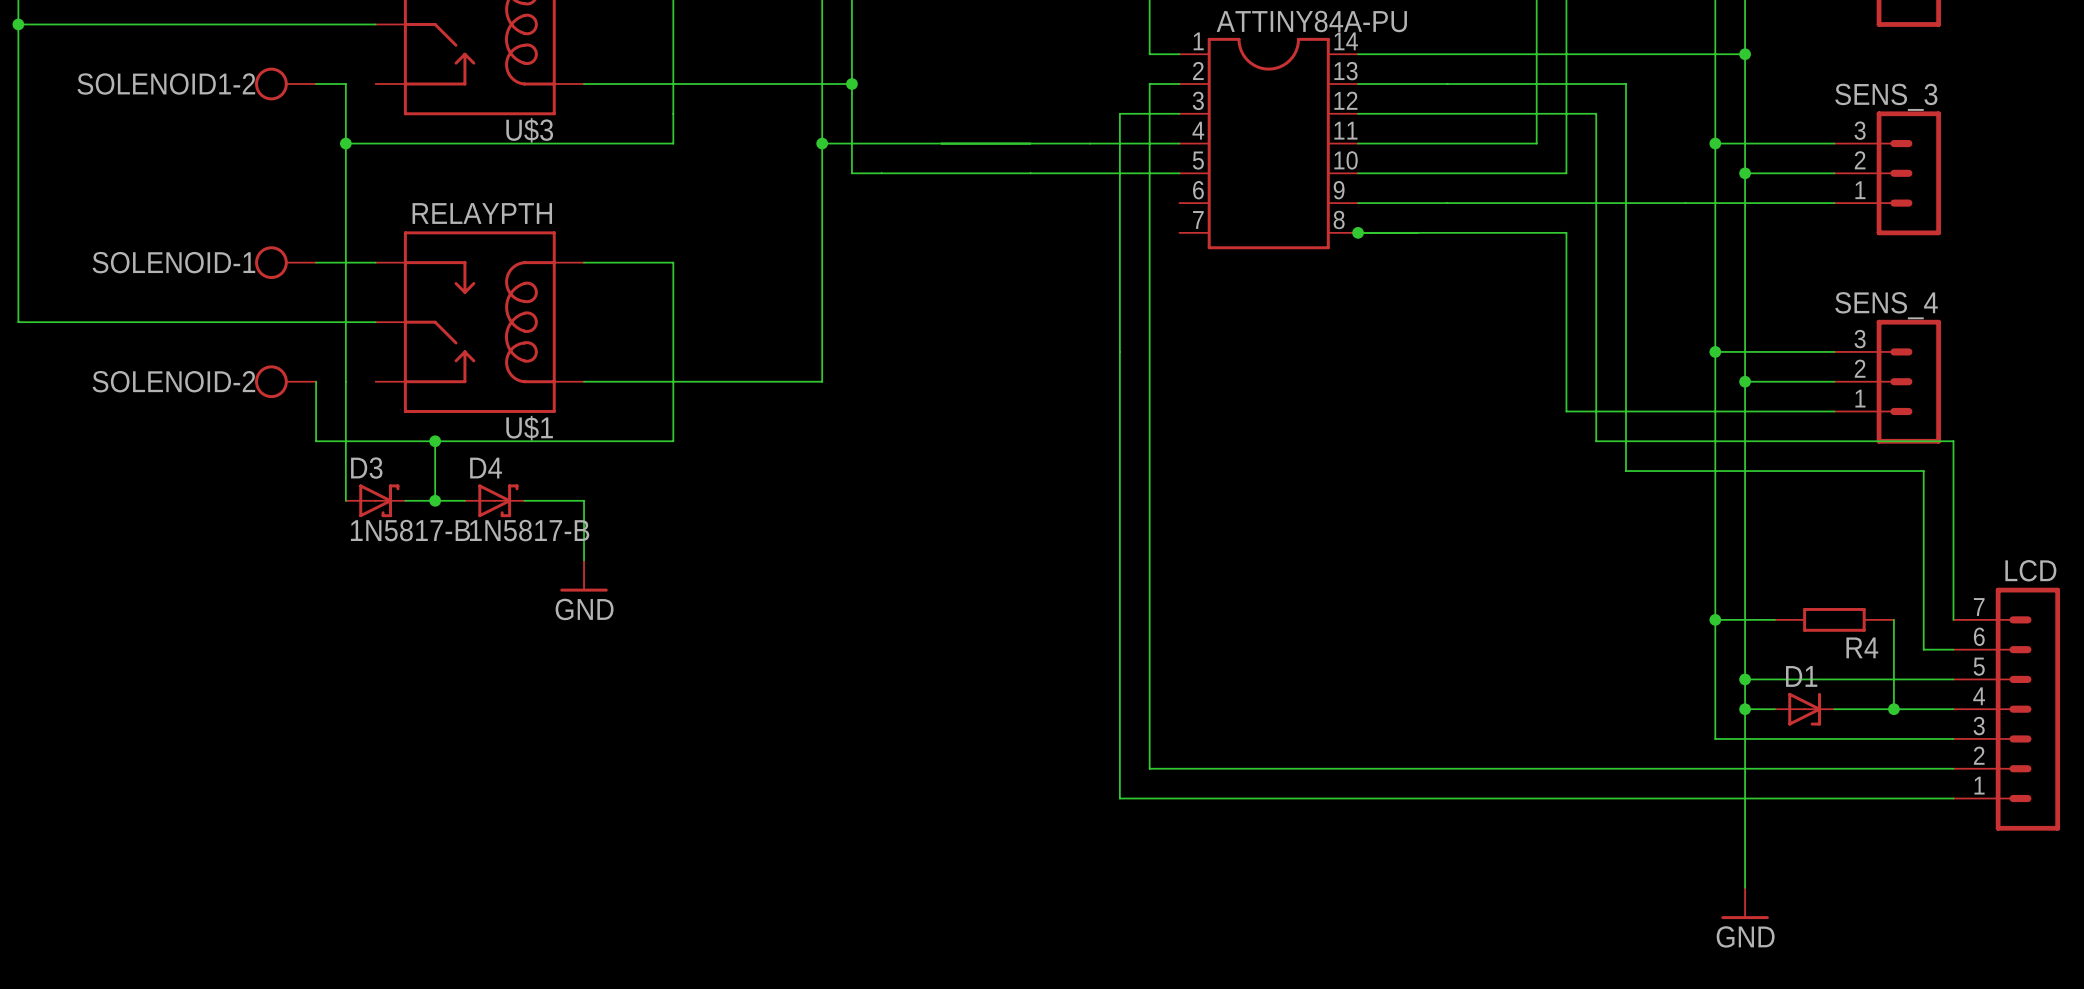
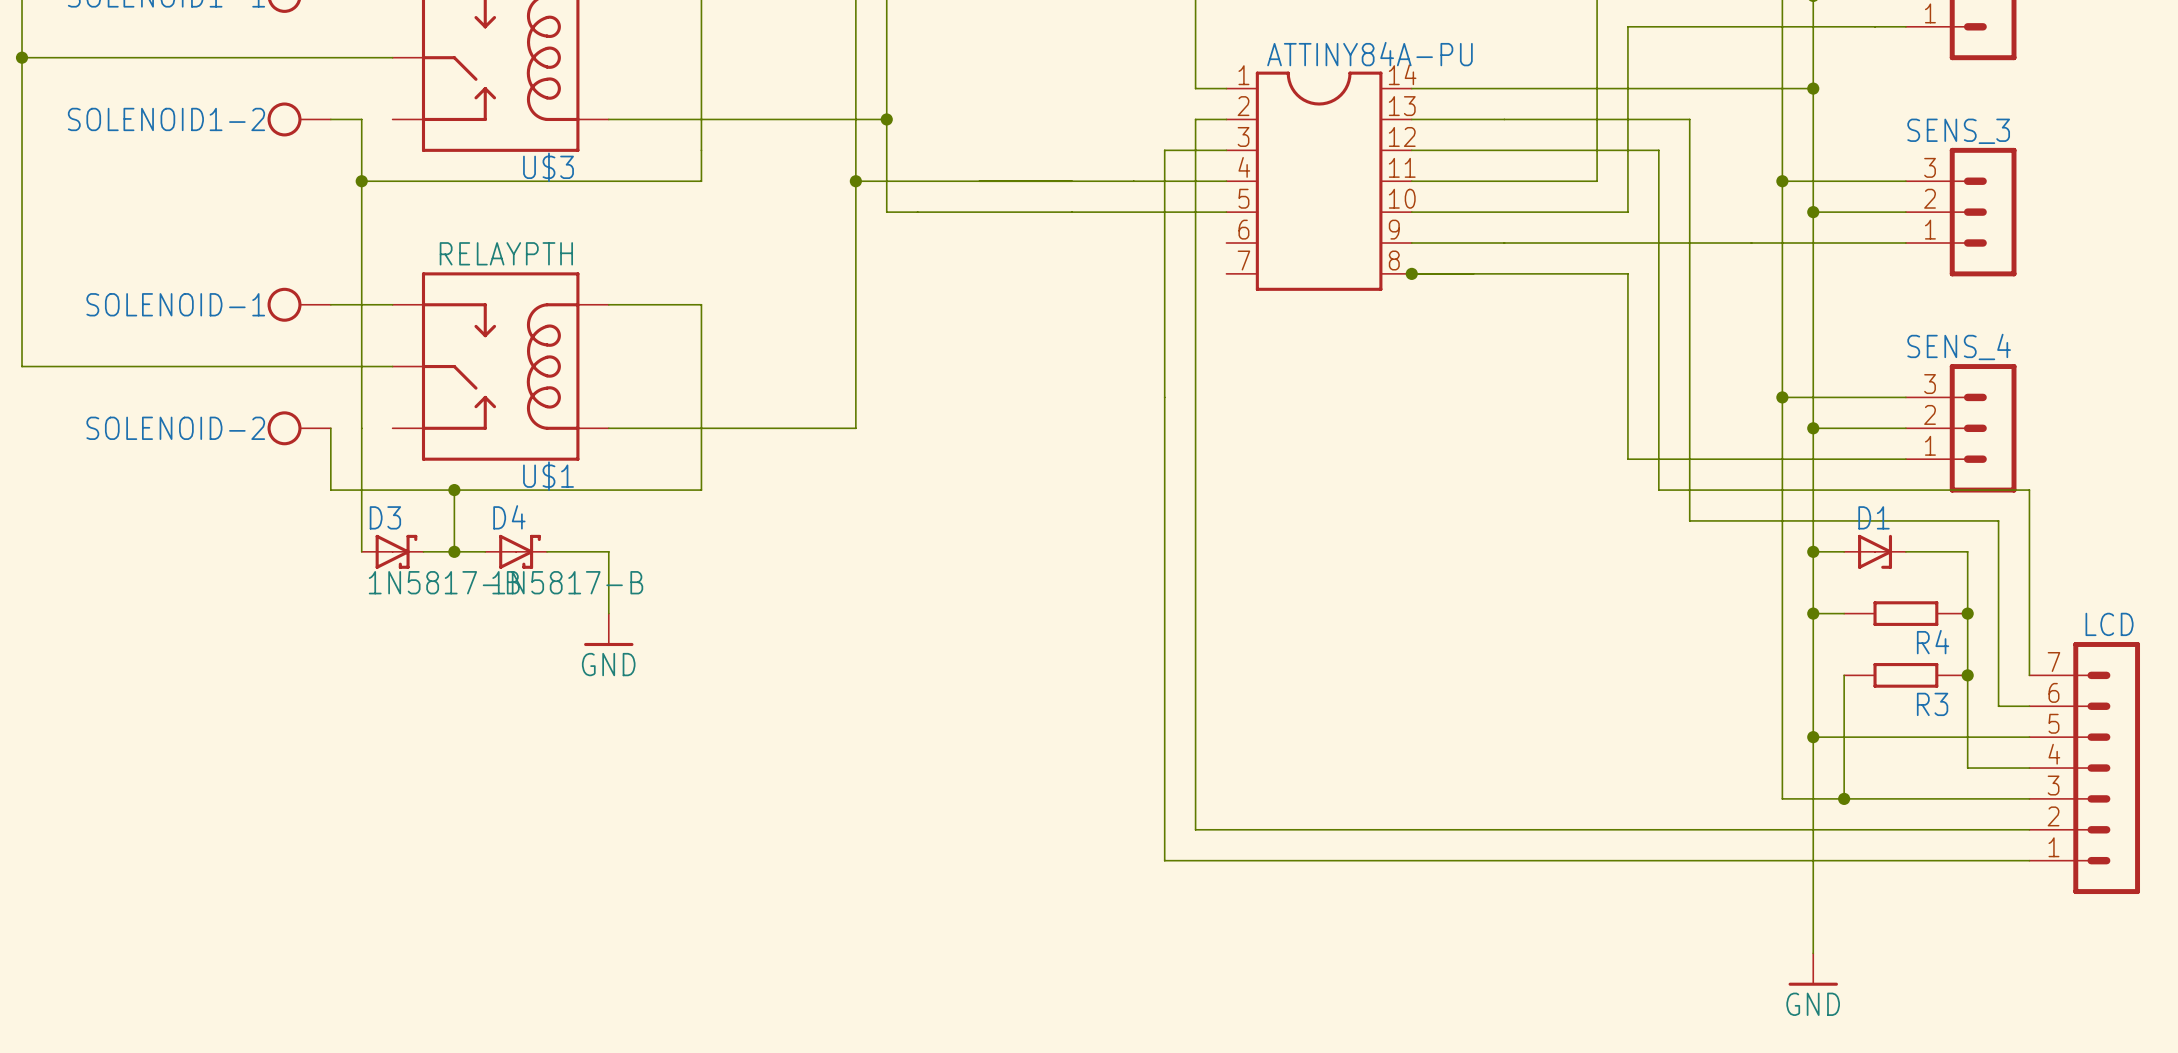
wire: none -> (1813, 551) (1844, 551)
junction: none -> (1813, 551)
wire: none -> (1905, 551) (1967, 551) (1967, 675)
junction: none -> (1813, 613)
R4: none -> (1905, 613)
junction: none -> (1967, 613)
wire: (1715, 619) (1774, 619) -> (1844, 798) (1844, 675)
junction: (1715, 619) -> none
junction: none -> (1967, 675)
R4 name: R4 (1862, 647) -> R3 (1932, 704)
wire: (1745, 709) (1774, 709) -> (1813, 613) (1844, 613)
junction position: (1745, 709) -> (1844, 798)
D1 position: (1804, 709) -> (1875, 551)
wire: (1834, 709) (1893, 709) -> none
junction: (1893, 709) -> none

